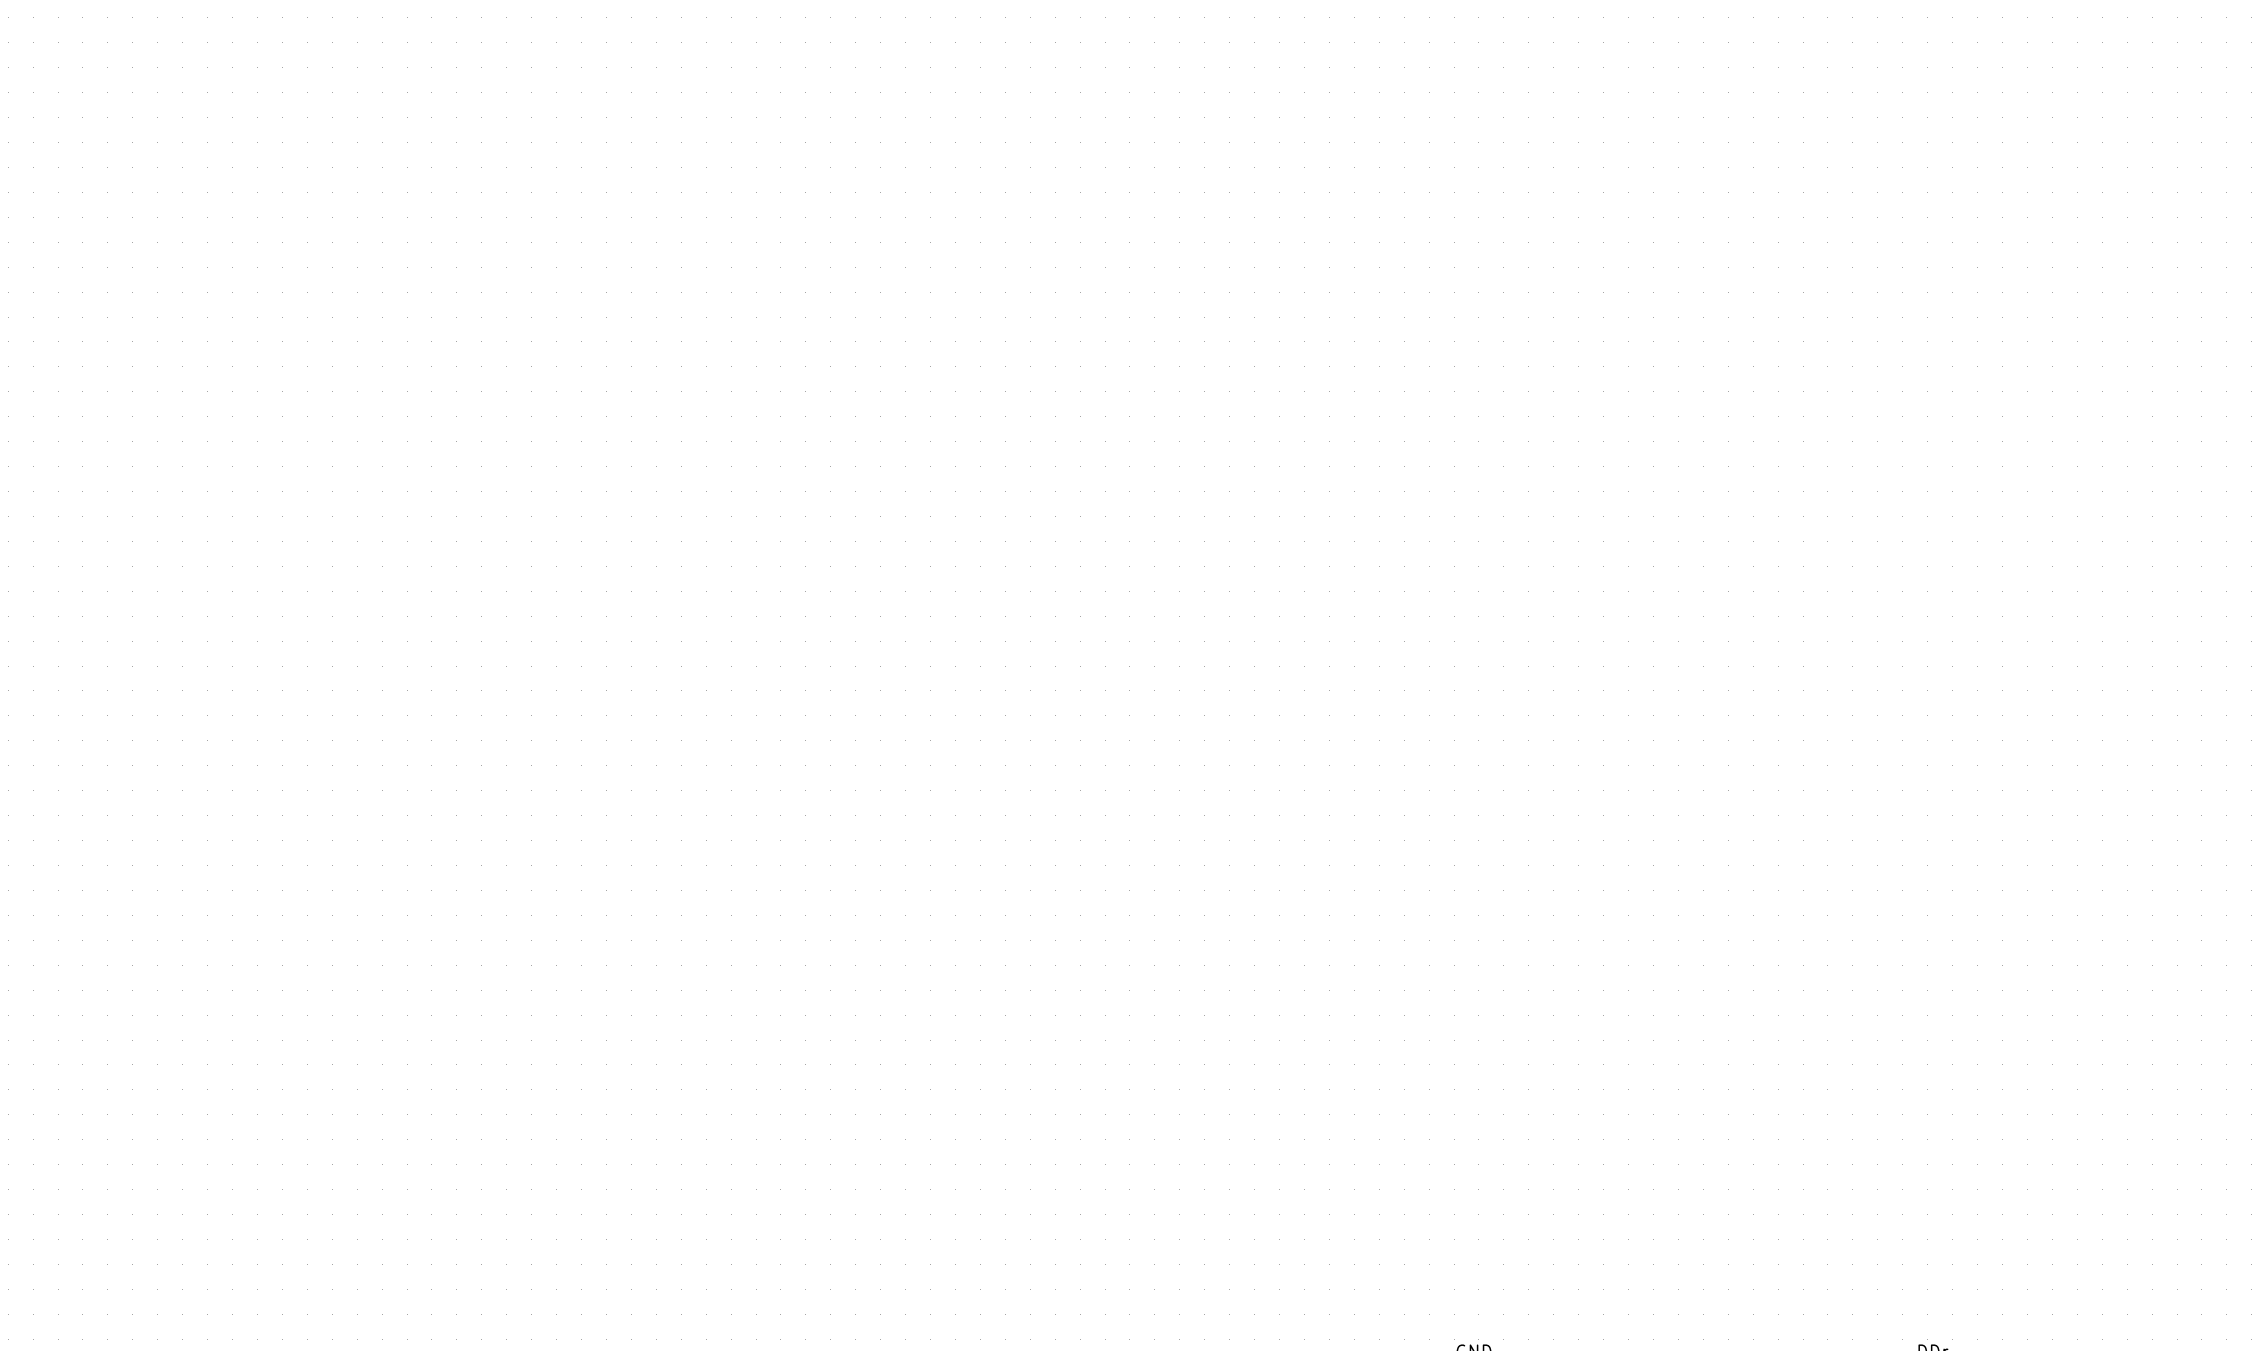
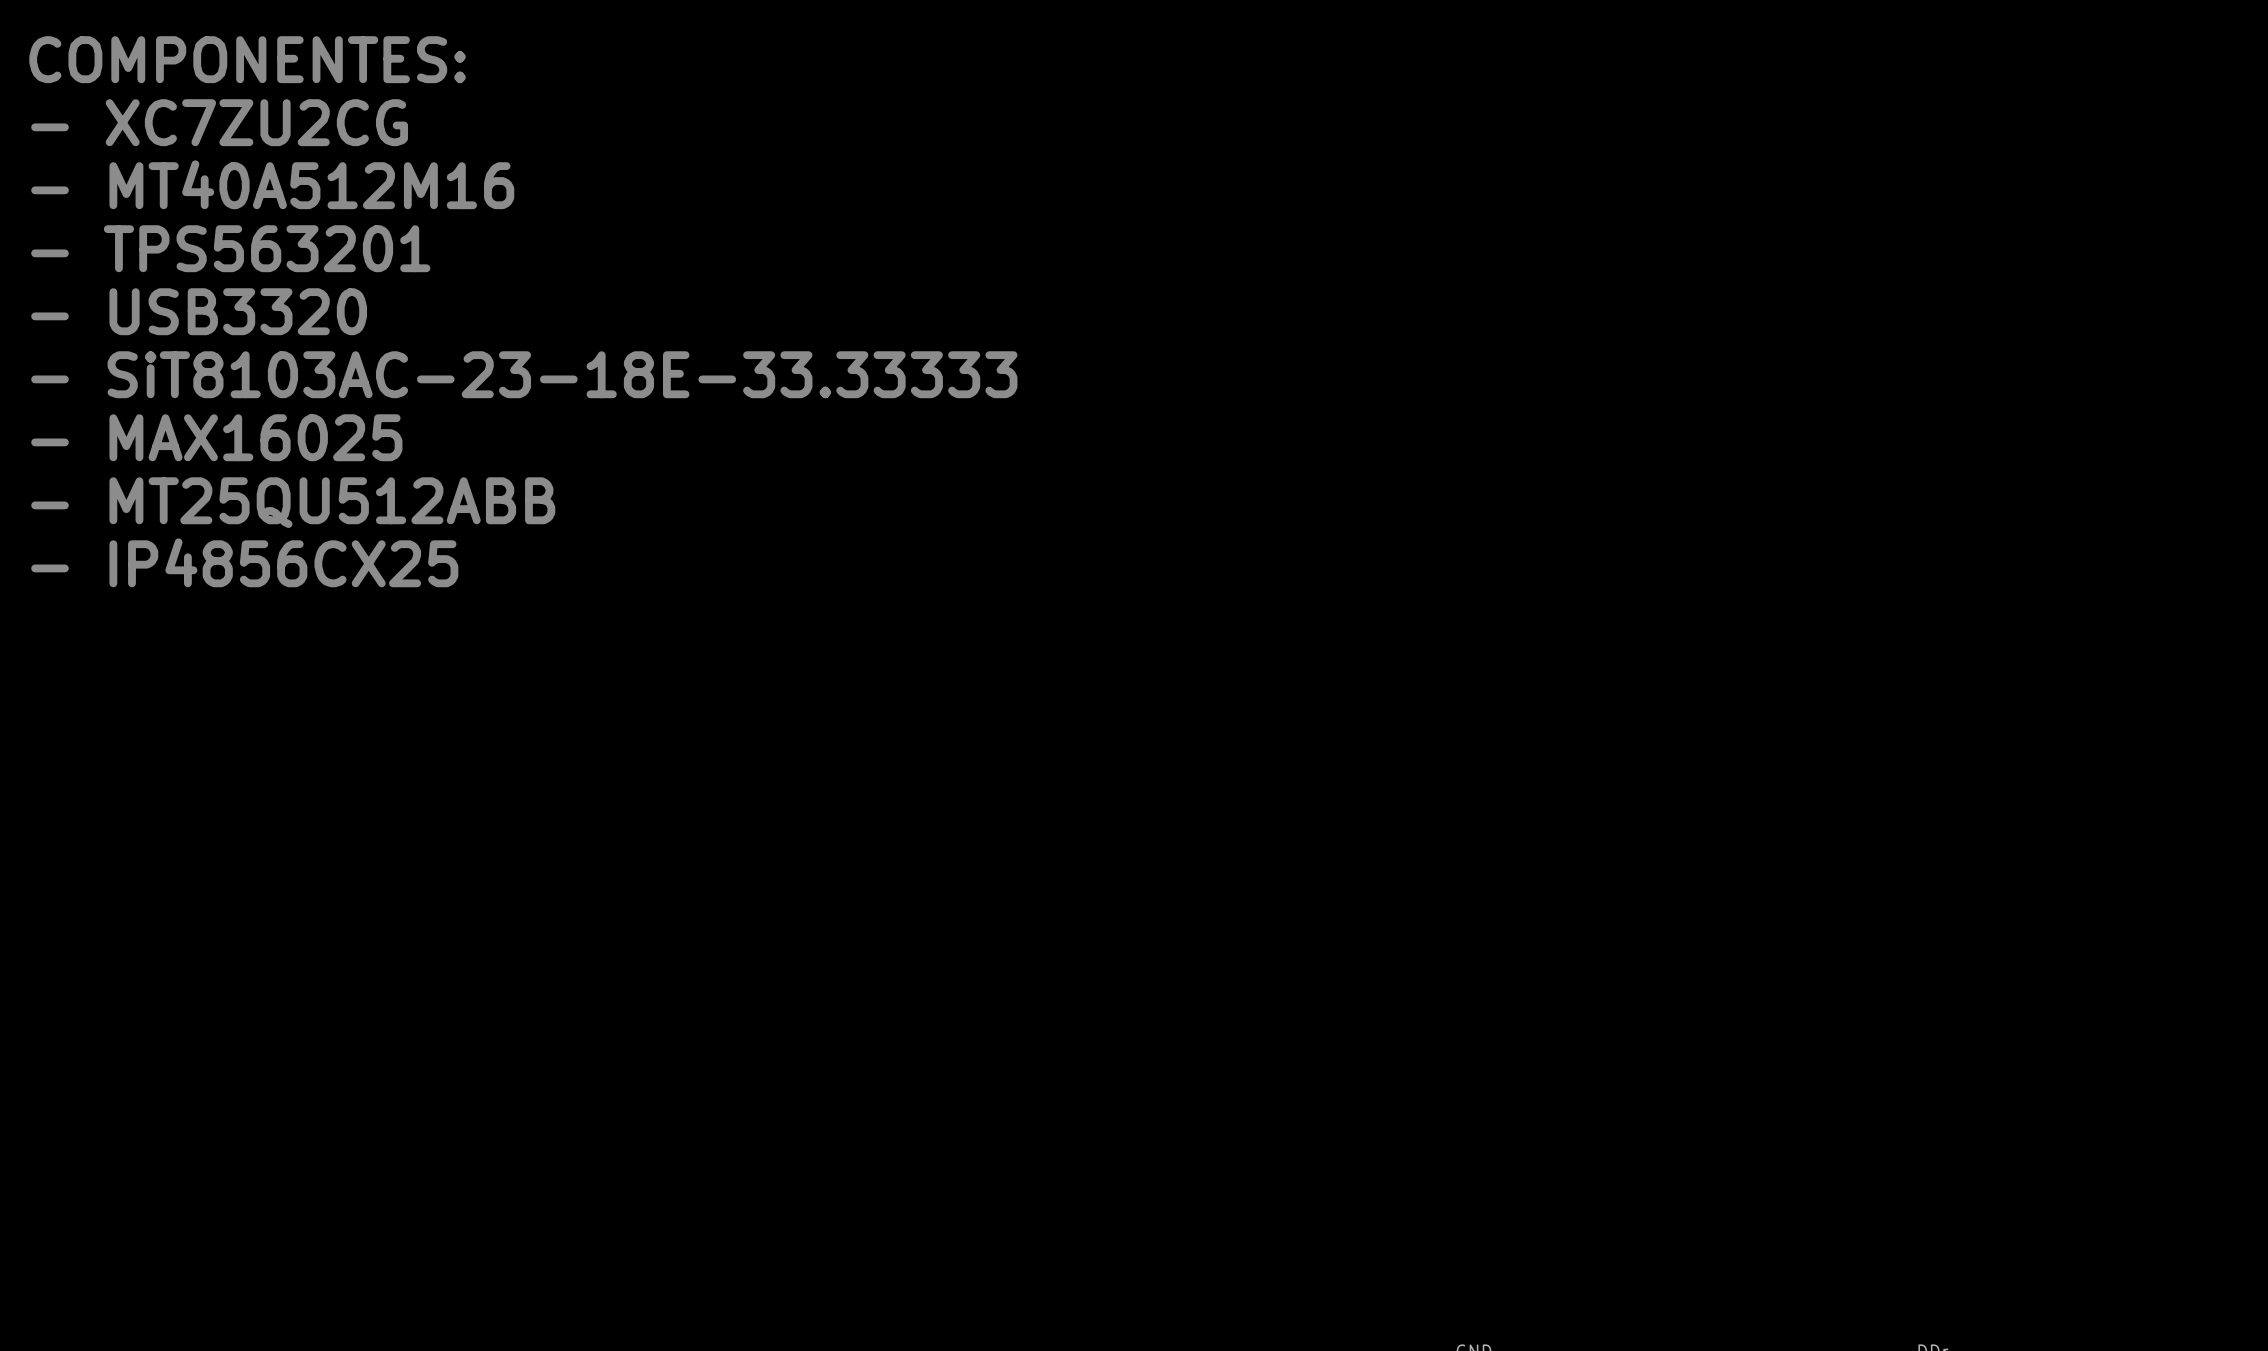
text: none -> COMPONENTES: (247, 59)
text: none -> - XC7ZU2CG (219, 122)
text: none -> - MT40A512M16 (272, 184)
text: none -> - TPS563201 (230, 248)
text: none -> - USB3320 (199, 311)
text: none -> - SiT8103AC-23-18E-33.33333 (524, 374)
text: none -> - MAX16025 (216, 437)
text: none -> - MT25QU512ABB (293, 502)
text: none -> - IP4856CX25 (244, 562)

